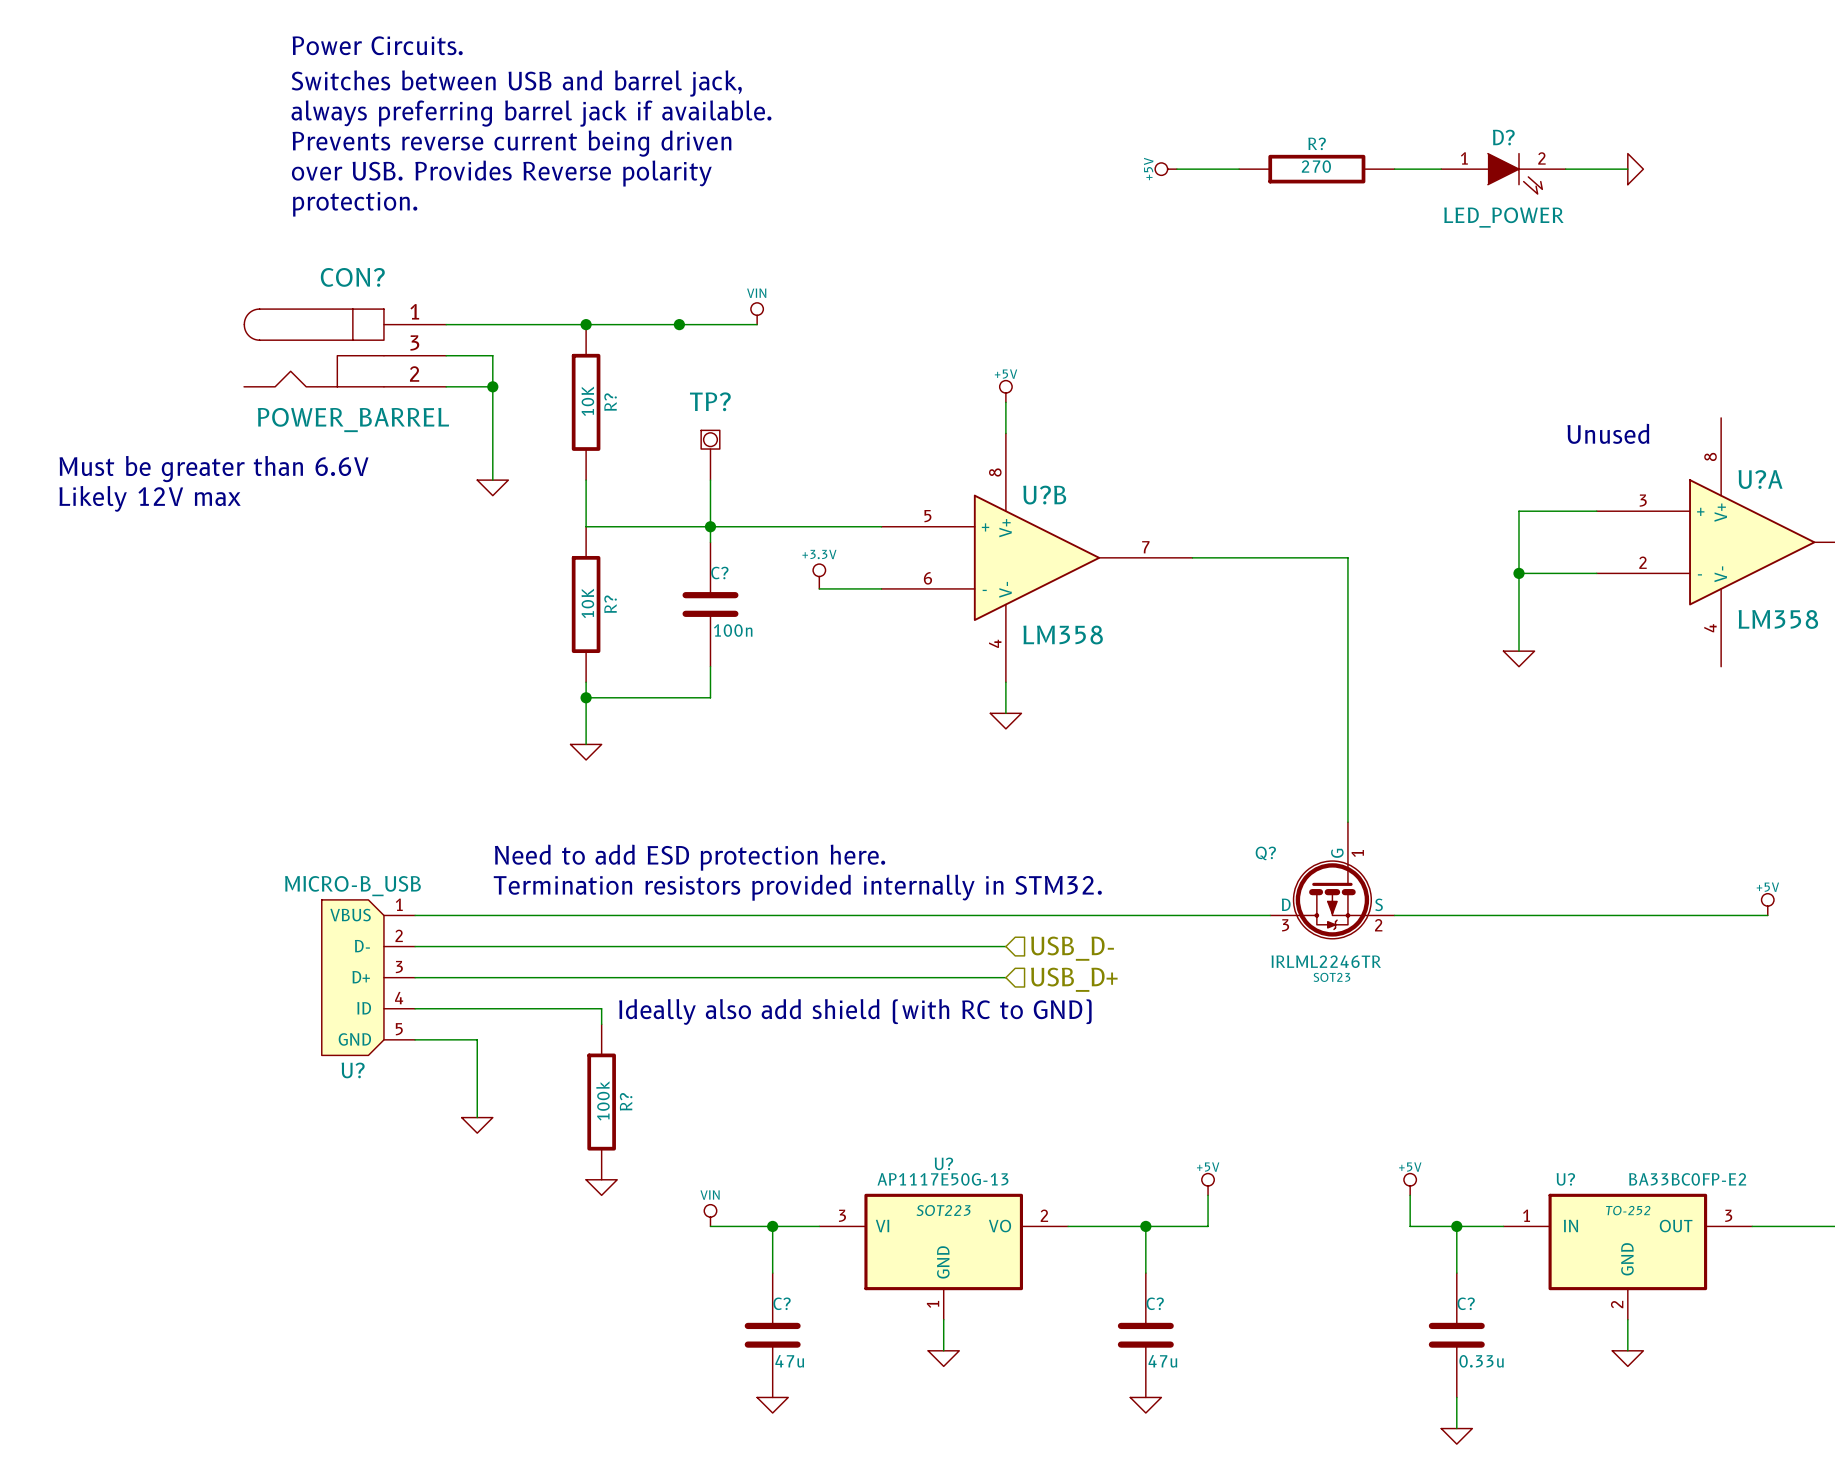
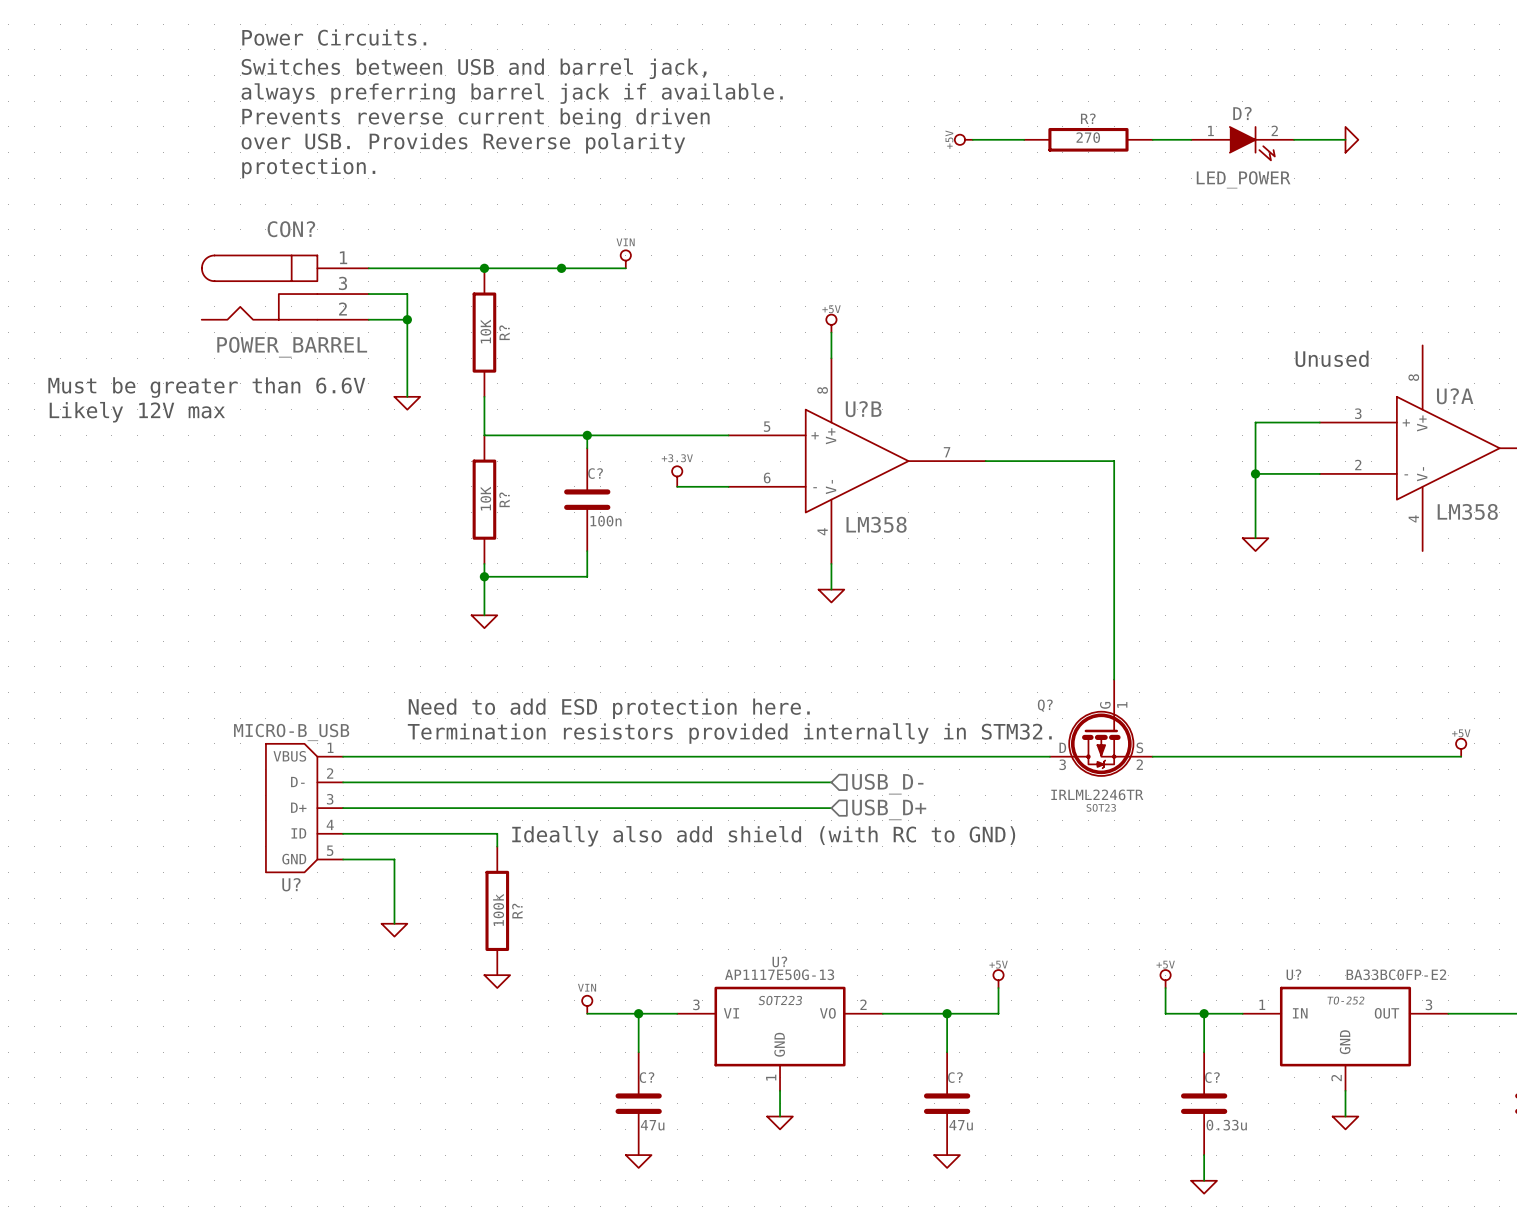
TP?: (710, 455) -> none
wire: (710, 480) (710, 526) -> none

